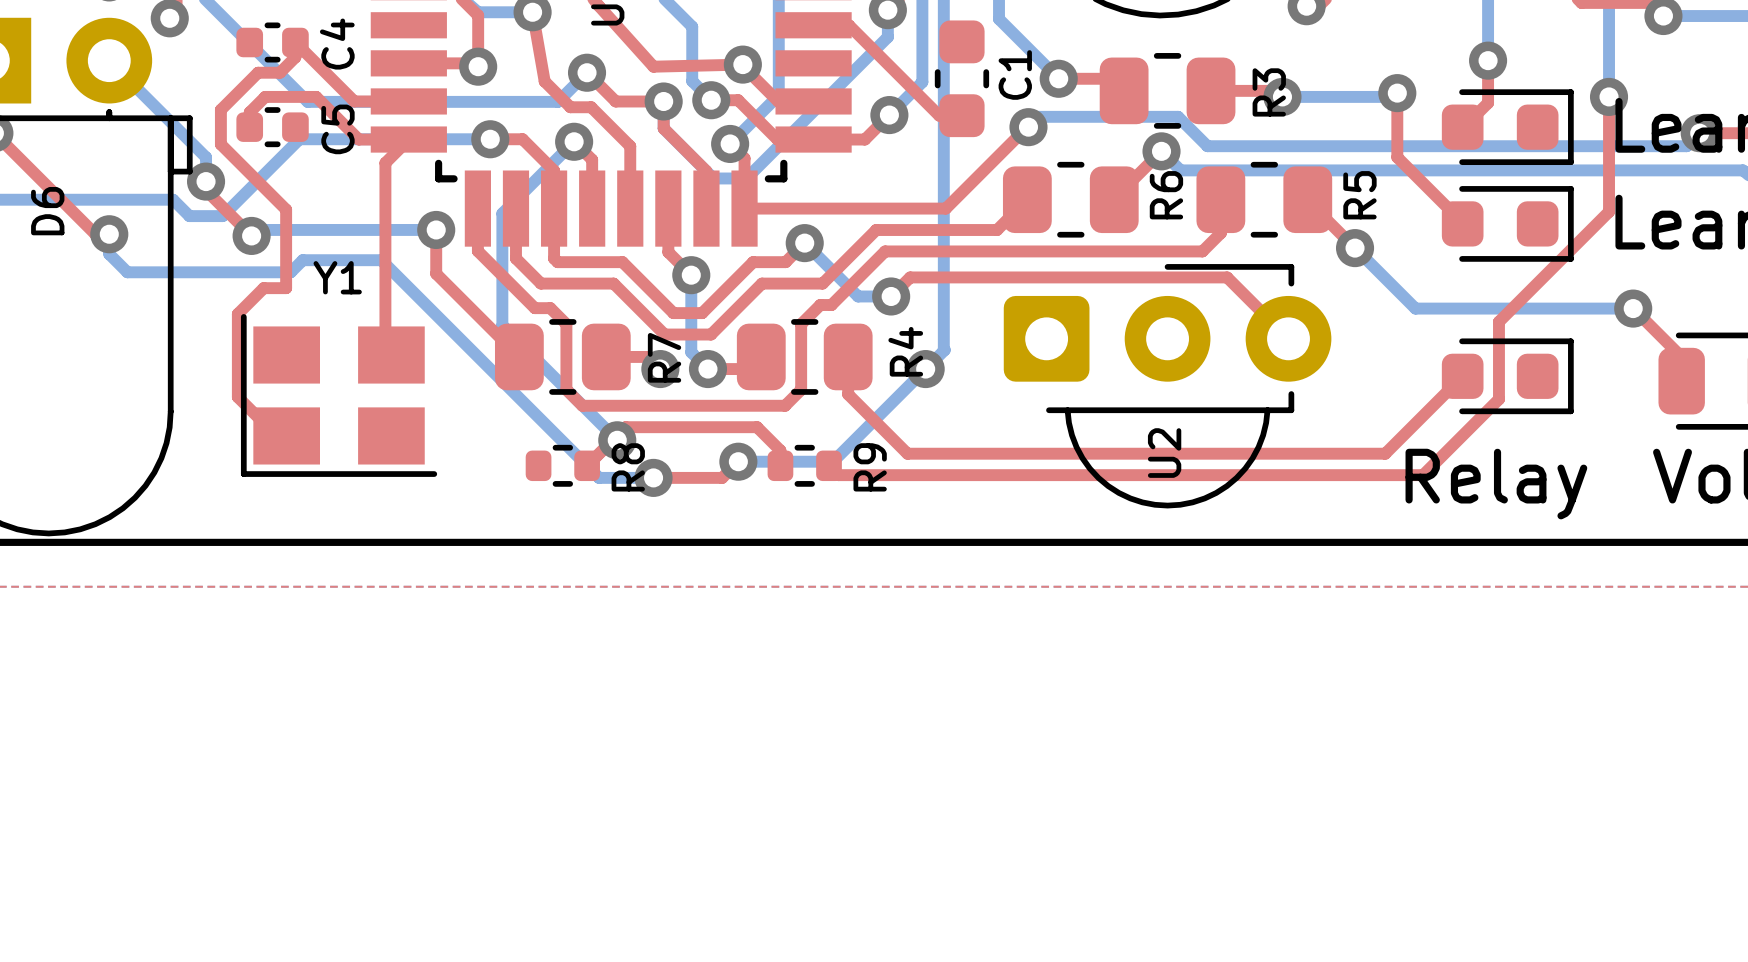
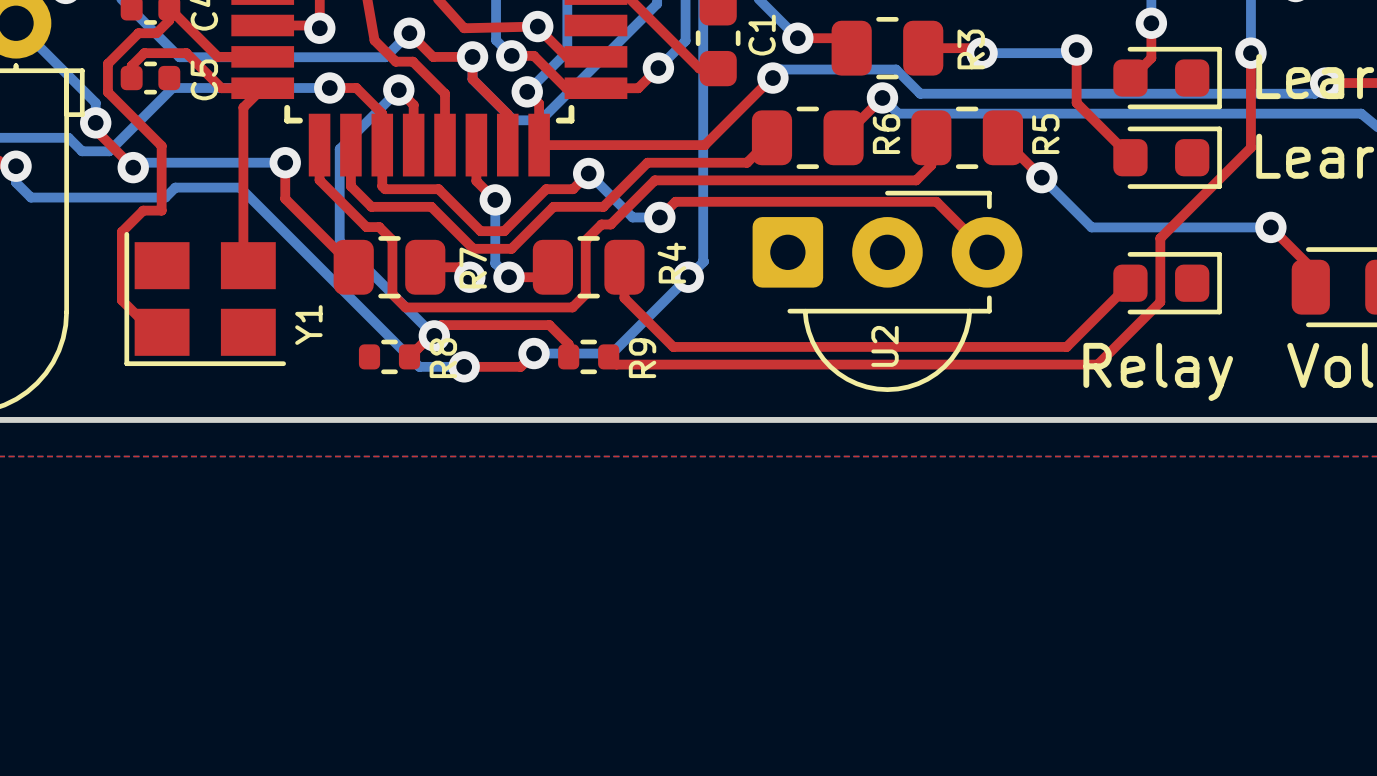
Y1 name rotation: 0° (337, 277) -> 90° counterclockwise (308, 325)
Y1 name position: Y1 (337, 277) -> Y1 (308, 325)

